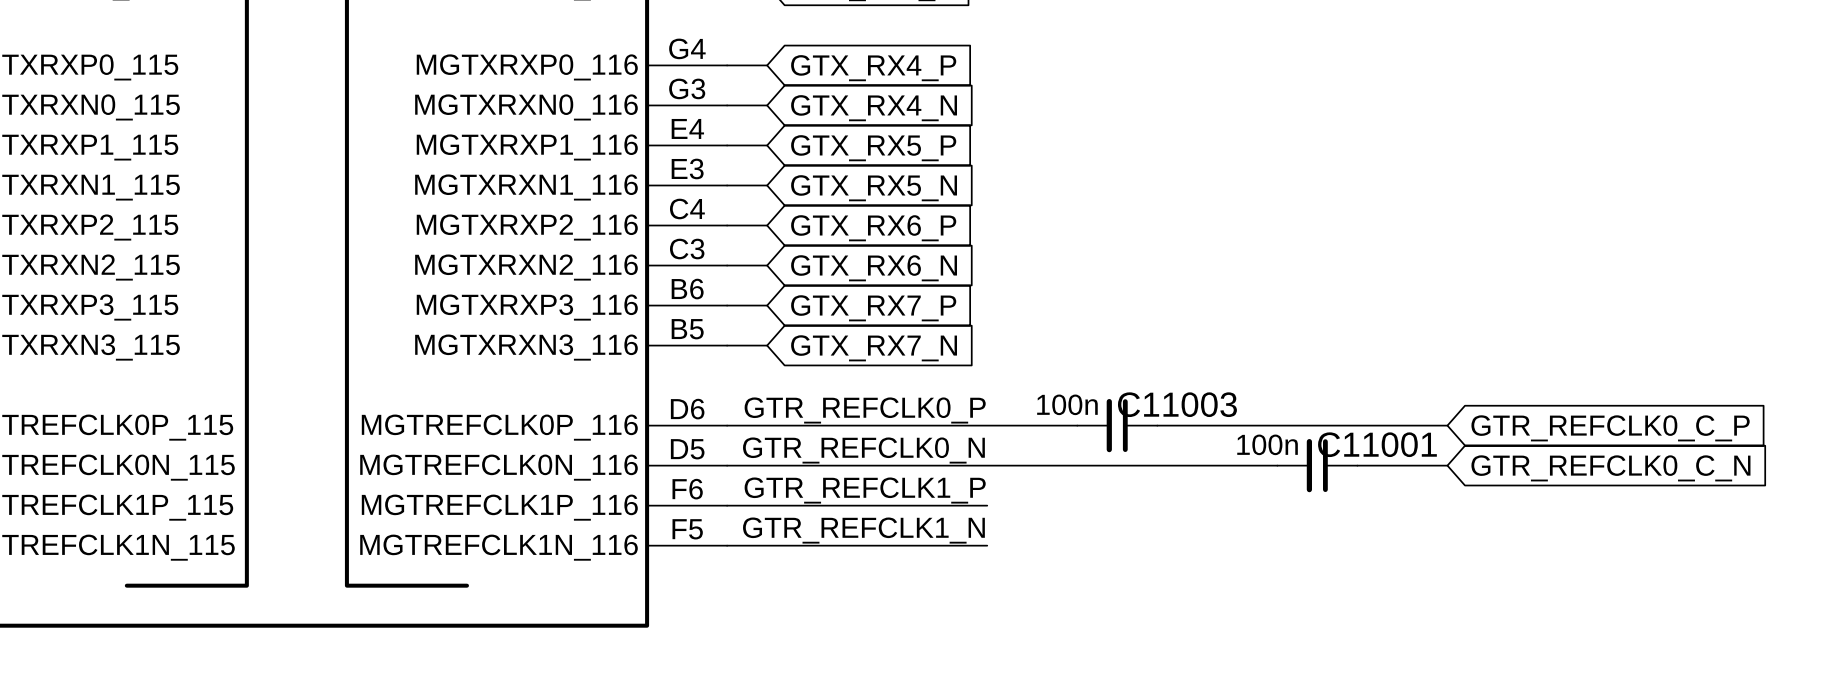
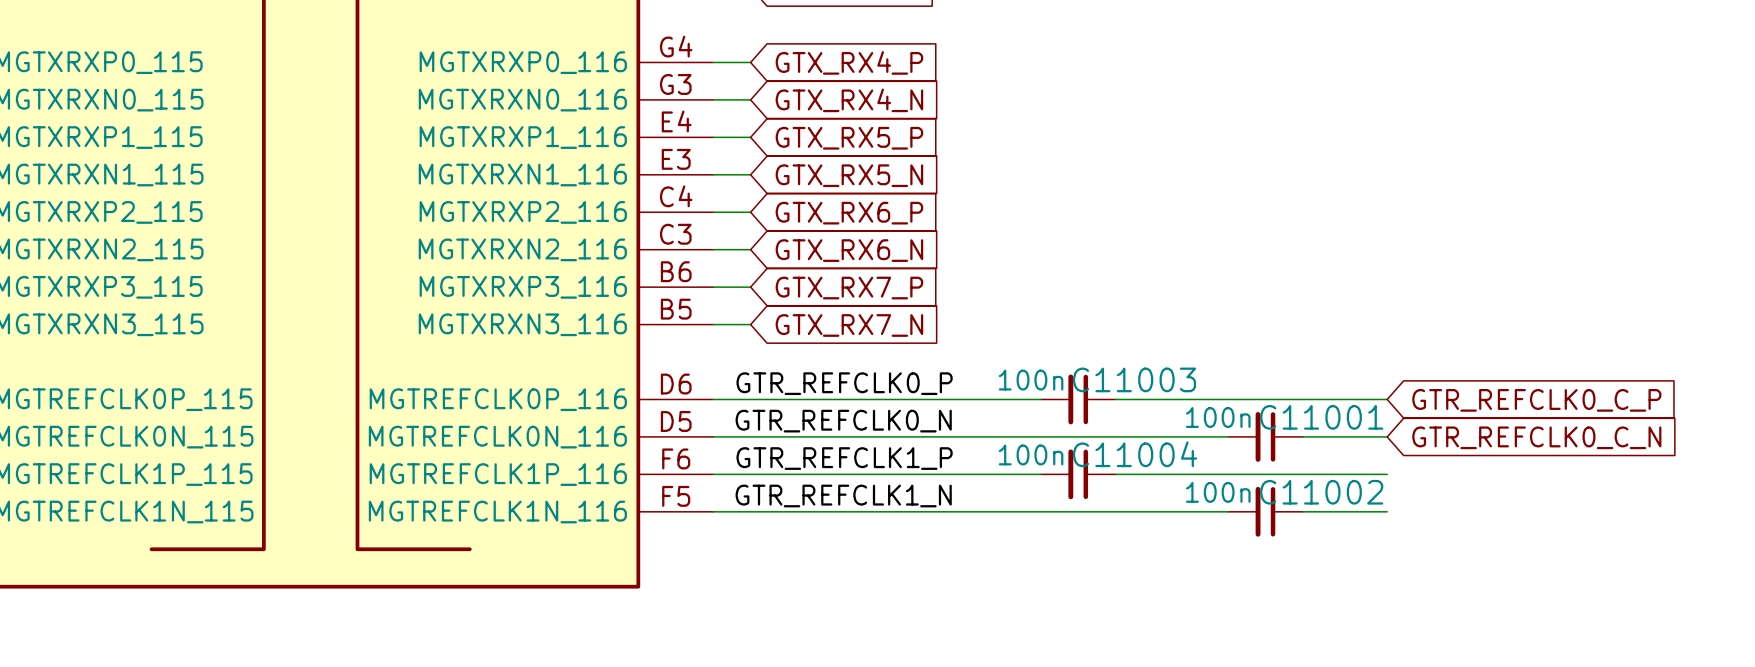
wire: none -> (956, 474) (1040, 474)
C11004: none -> (1078, 474)
wire: none -> (1115, 474) (1387, 474)
wire: none -> (956, 511) (1228, 511)
C11002: none -> (1265, 511)
wire: none -> (1302, 511) (1387, 511)

